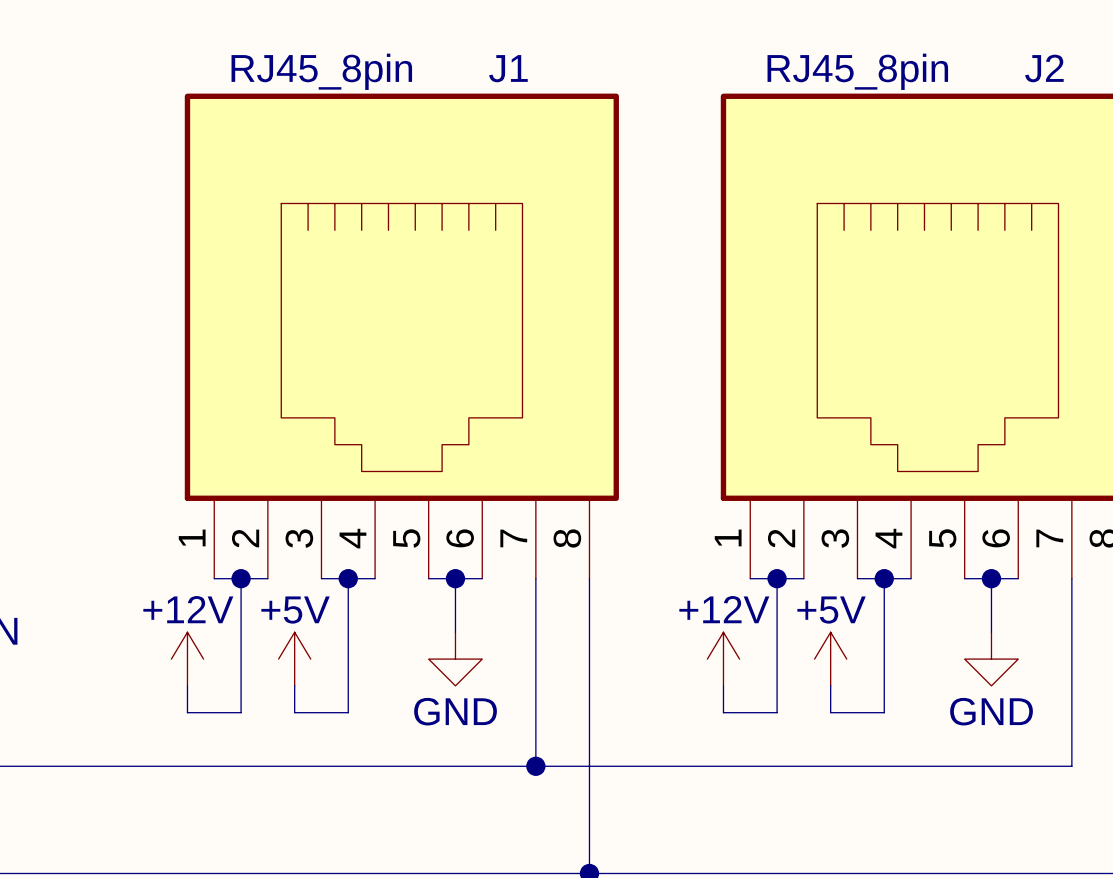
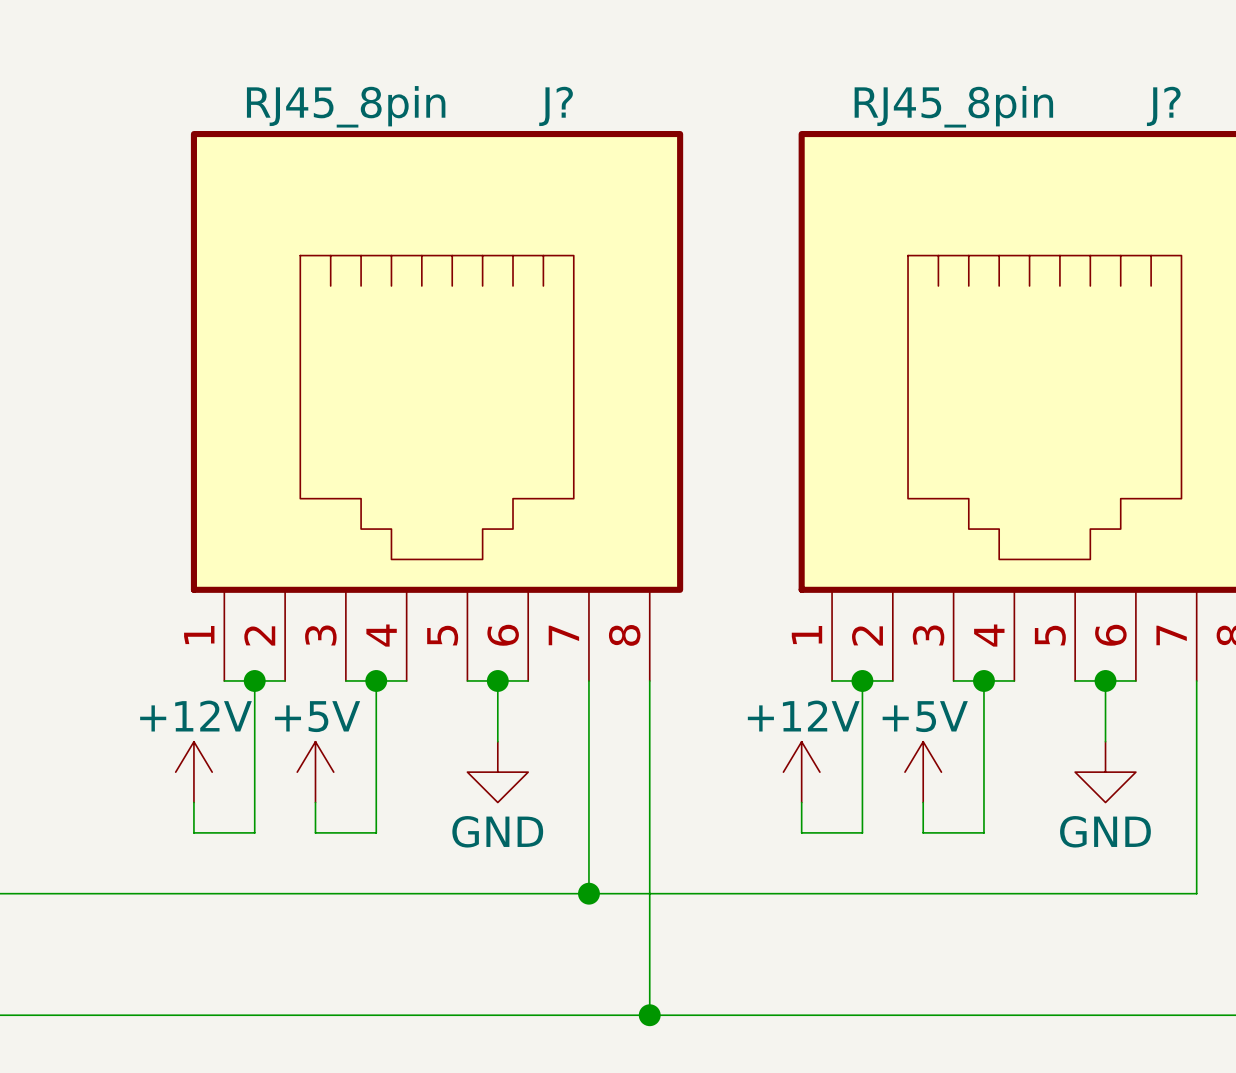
J1 name: J1 (508, 68) -> J? (556, 106)
J2 name: J2 (1044, 68) -> J? (1163, 106)

